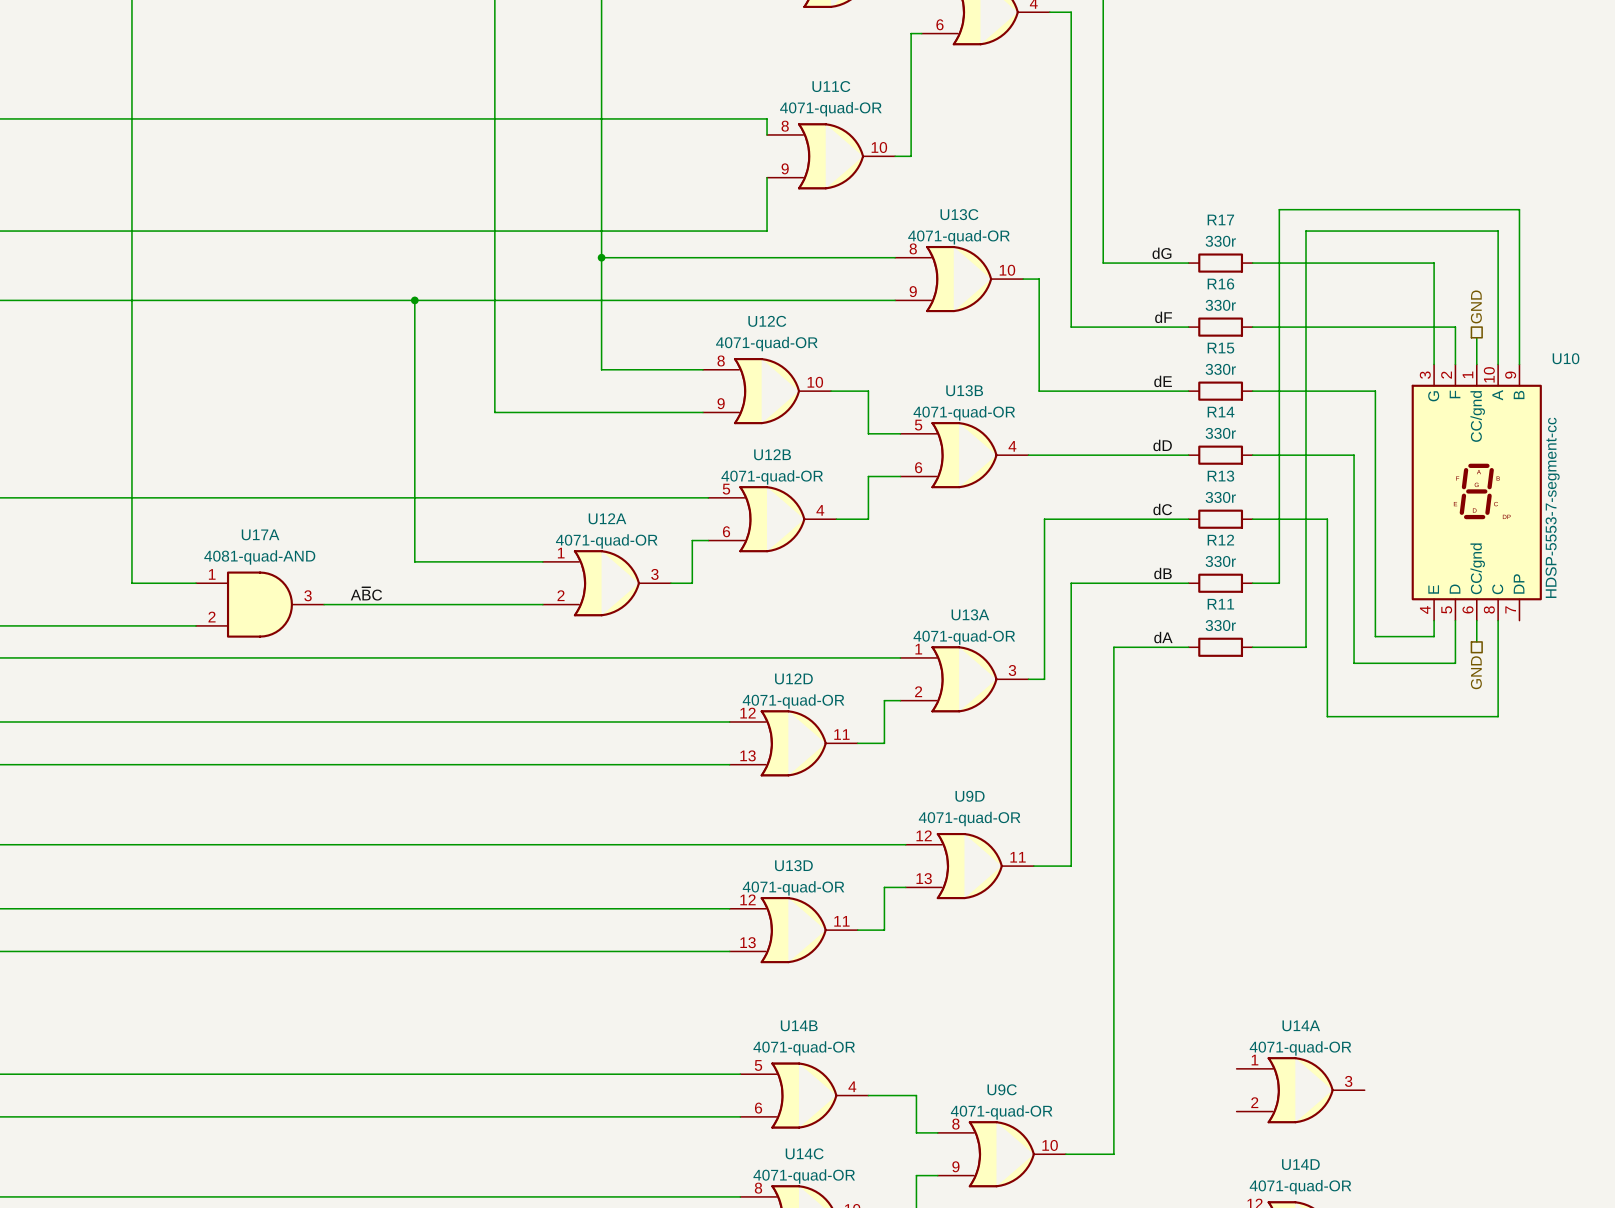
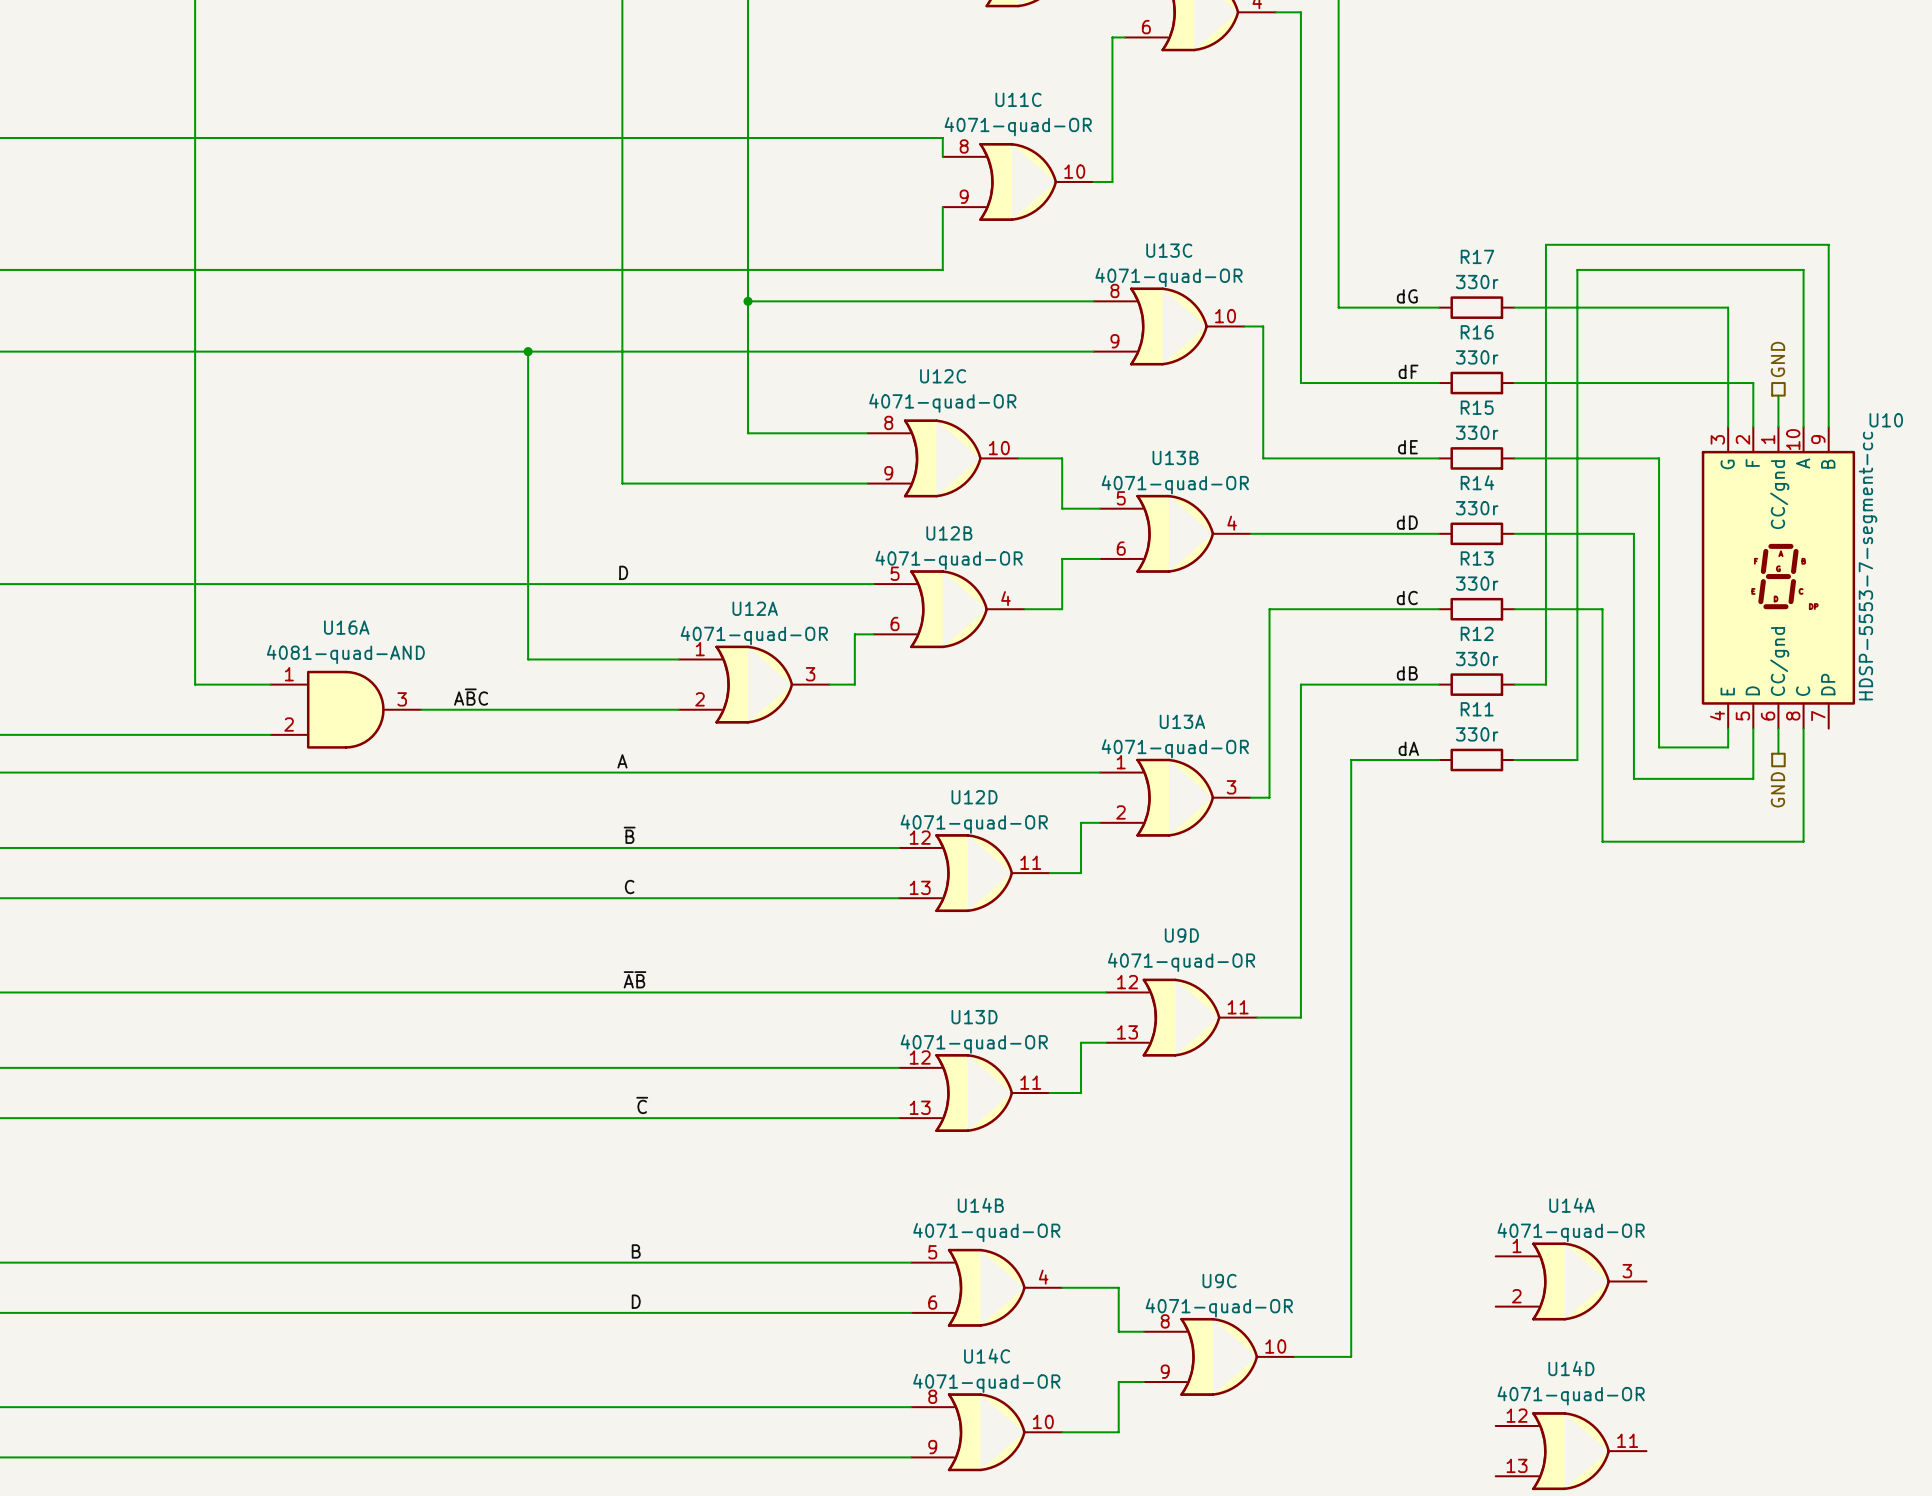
label: none -> D (623, 572)
U17A name: U17A (260, 534) -> U16A (346, 627)
label: none -> A (622, 761)
label: none -> ~{B} (629, 835)
label: none -> C (629, 887)
label: none -> ~{A}~{B} (635, 979)
label: none -> ~{C} (642, 1105)
label: none -> B (636, 1251)
label: none -> D (636, 1301)

